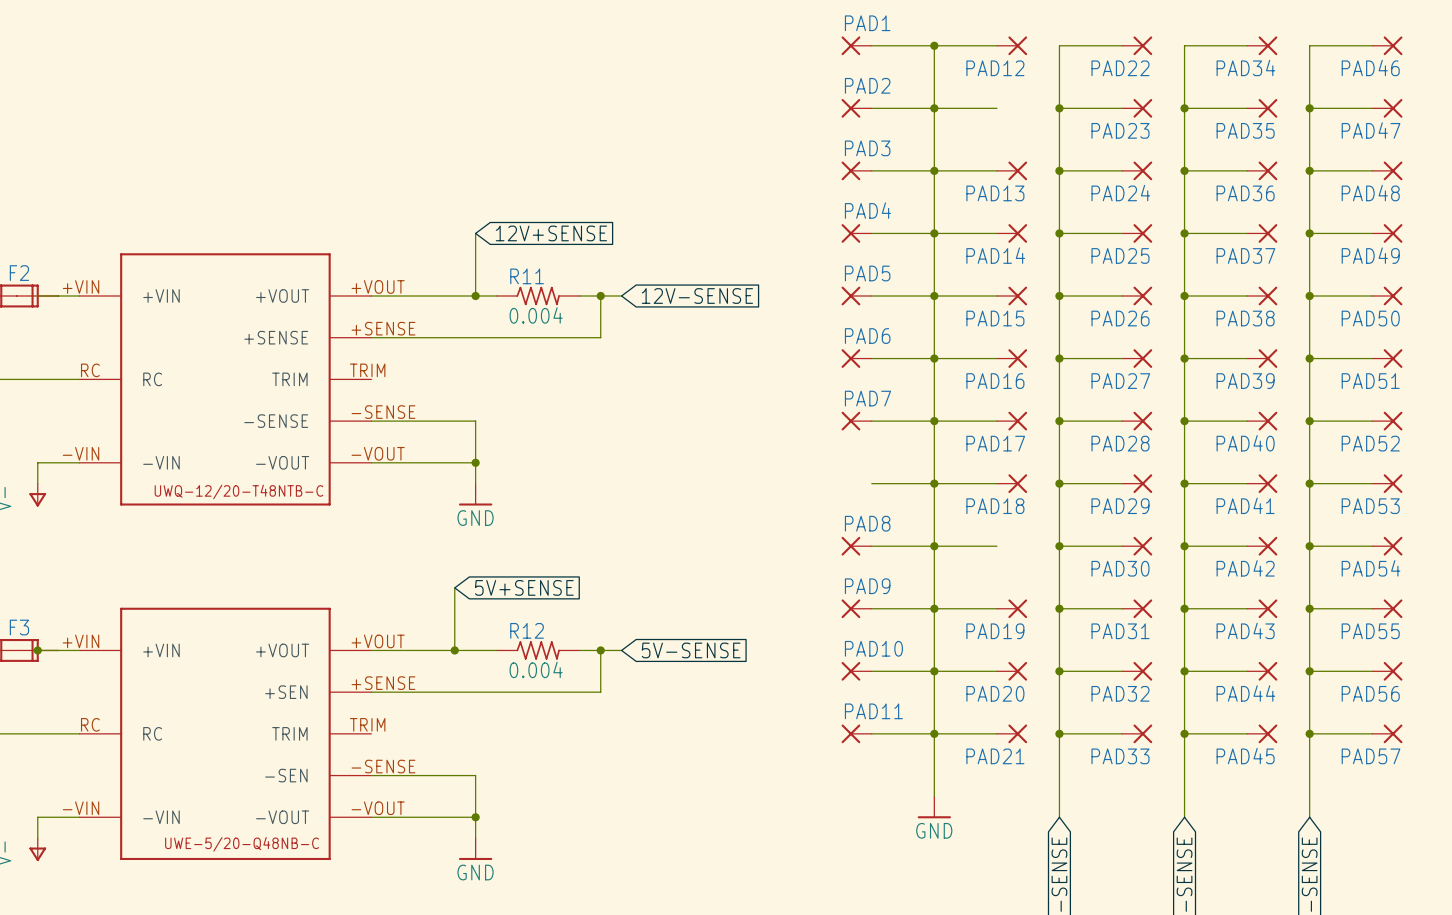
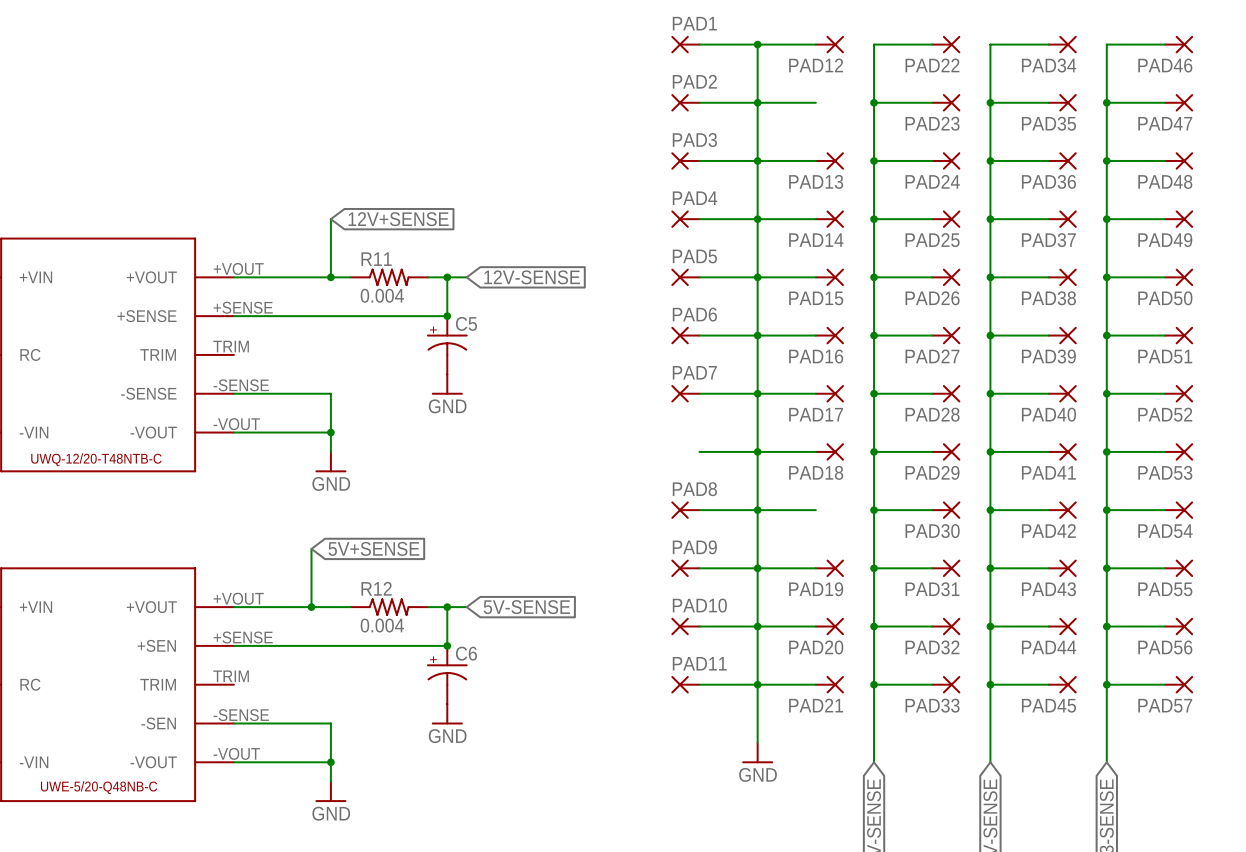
junction: none -> (447, 316)
C5: none -> (447, 345)
power symbol: none -> GND (447, 384)
junction: none -> (447, 645)
C6: none -> (447, 675)
power symbol: none -> GND (447, 714)

